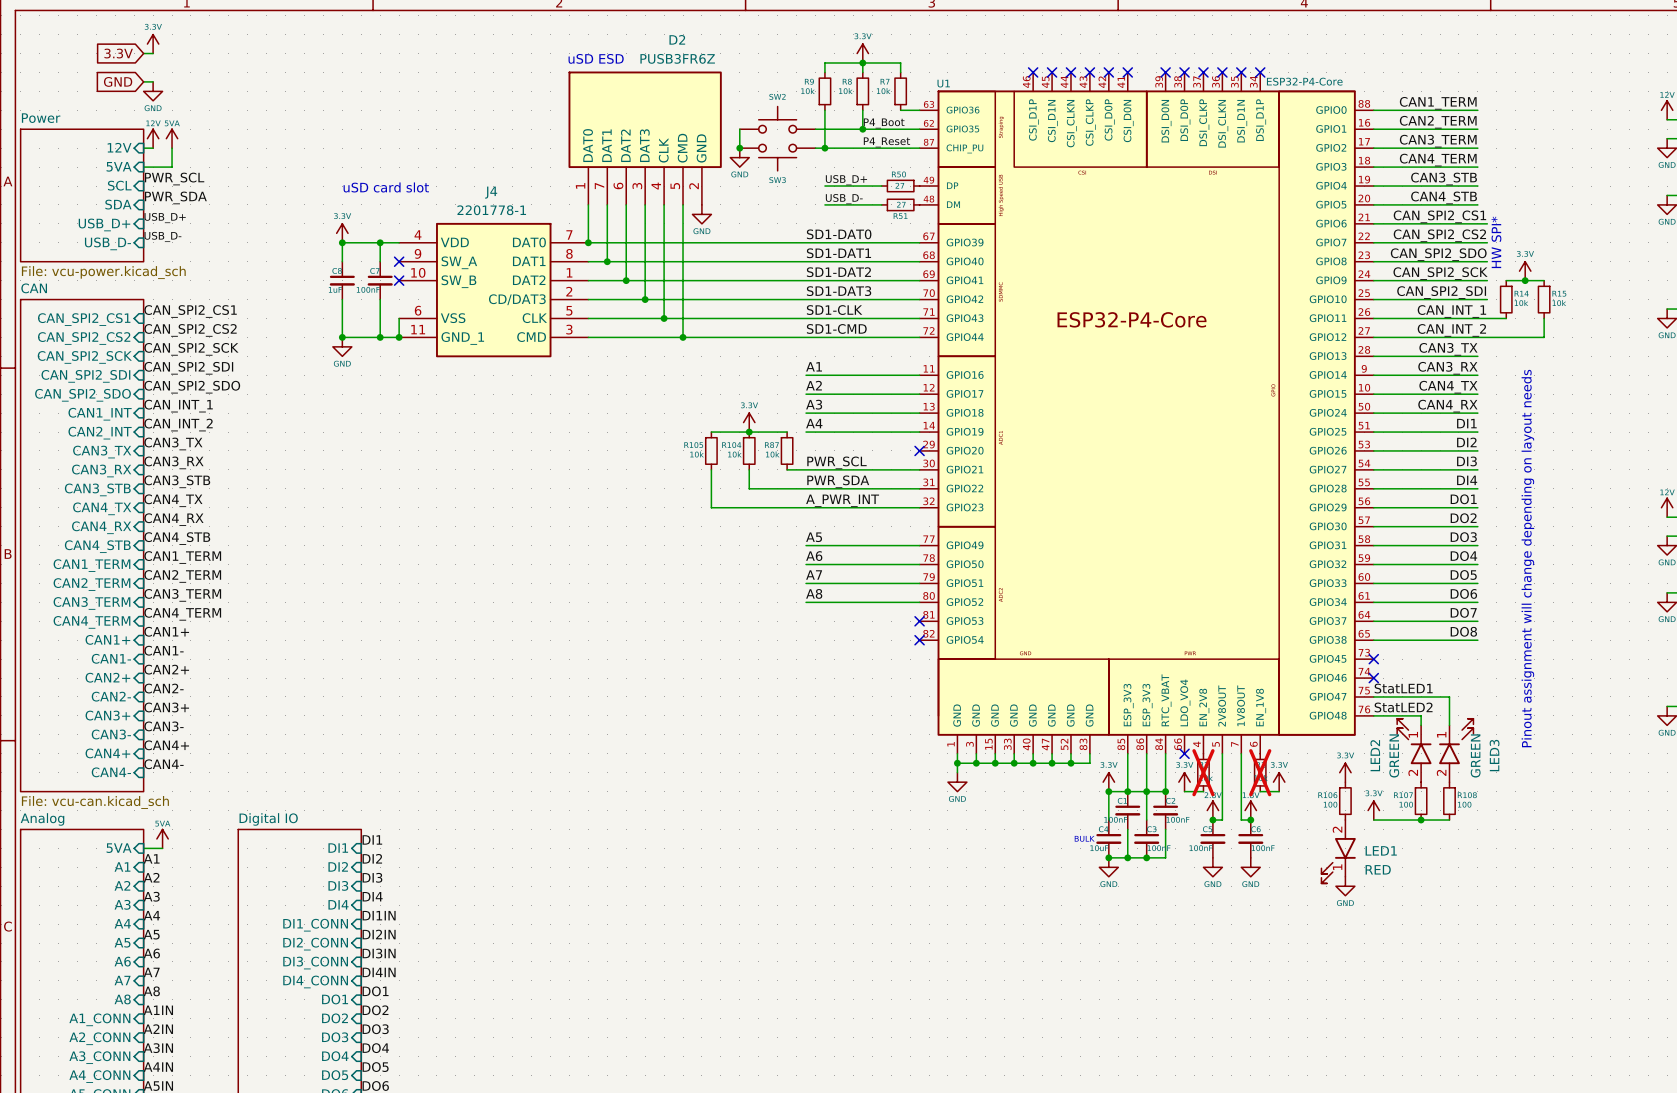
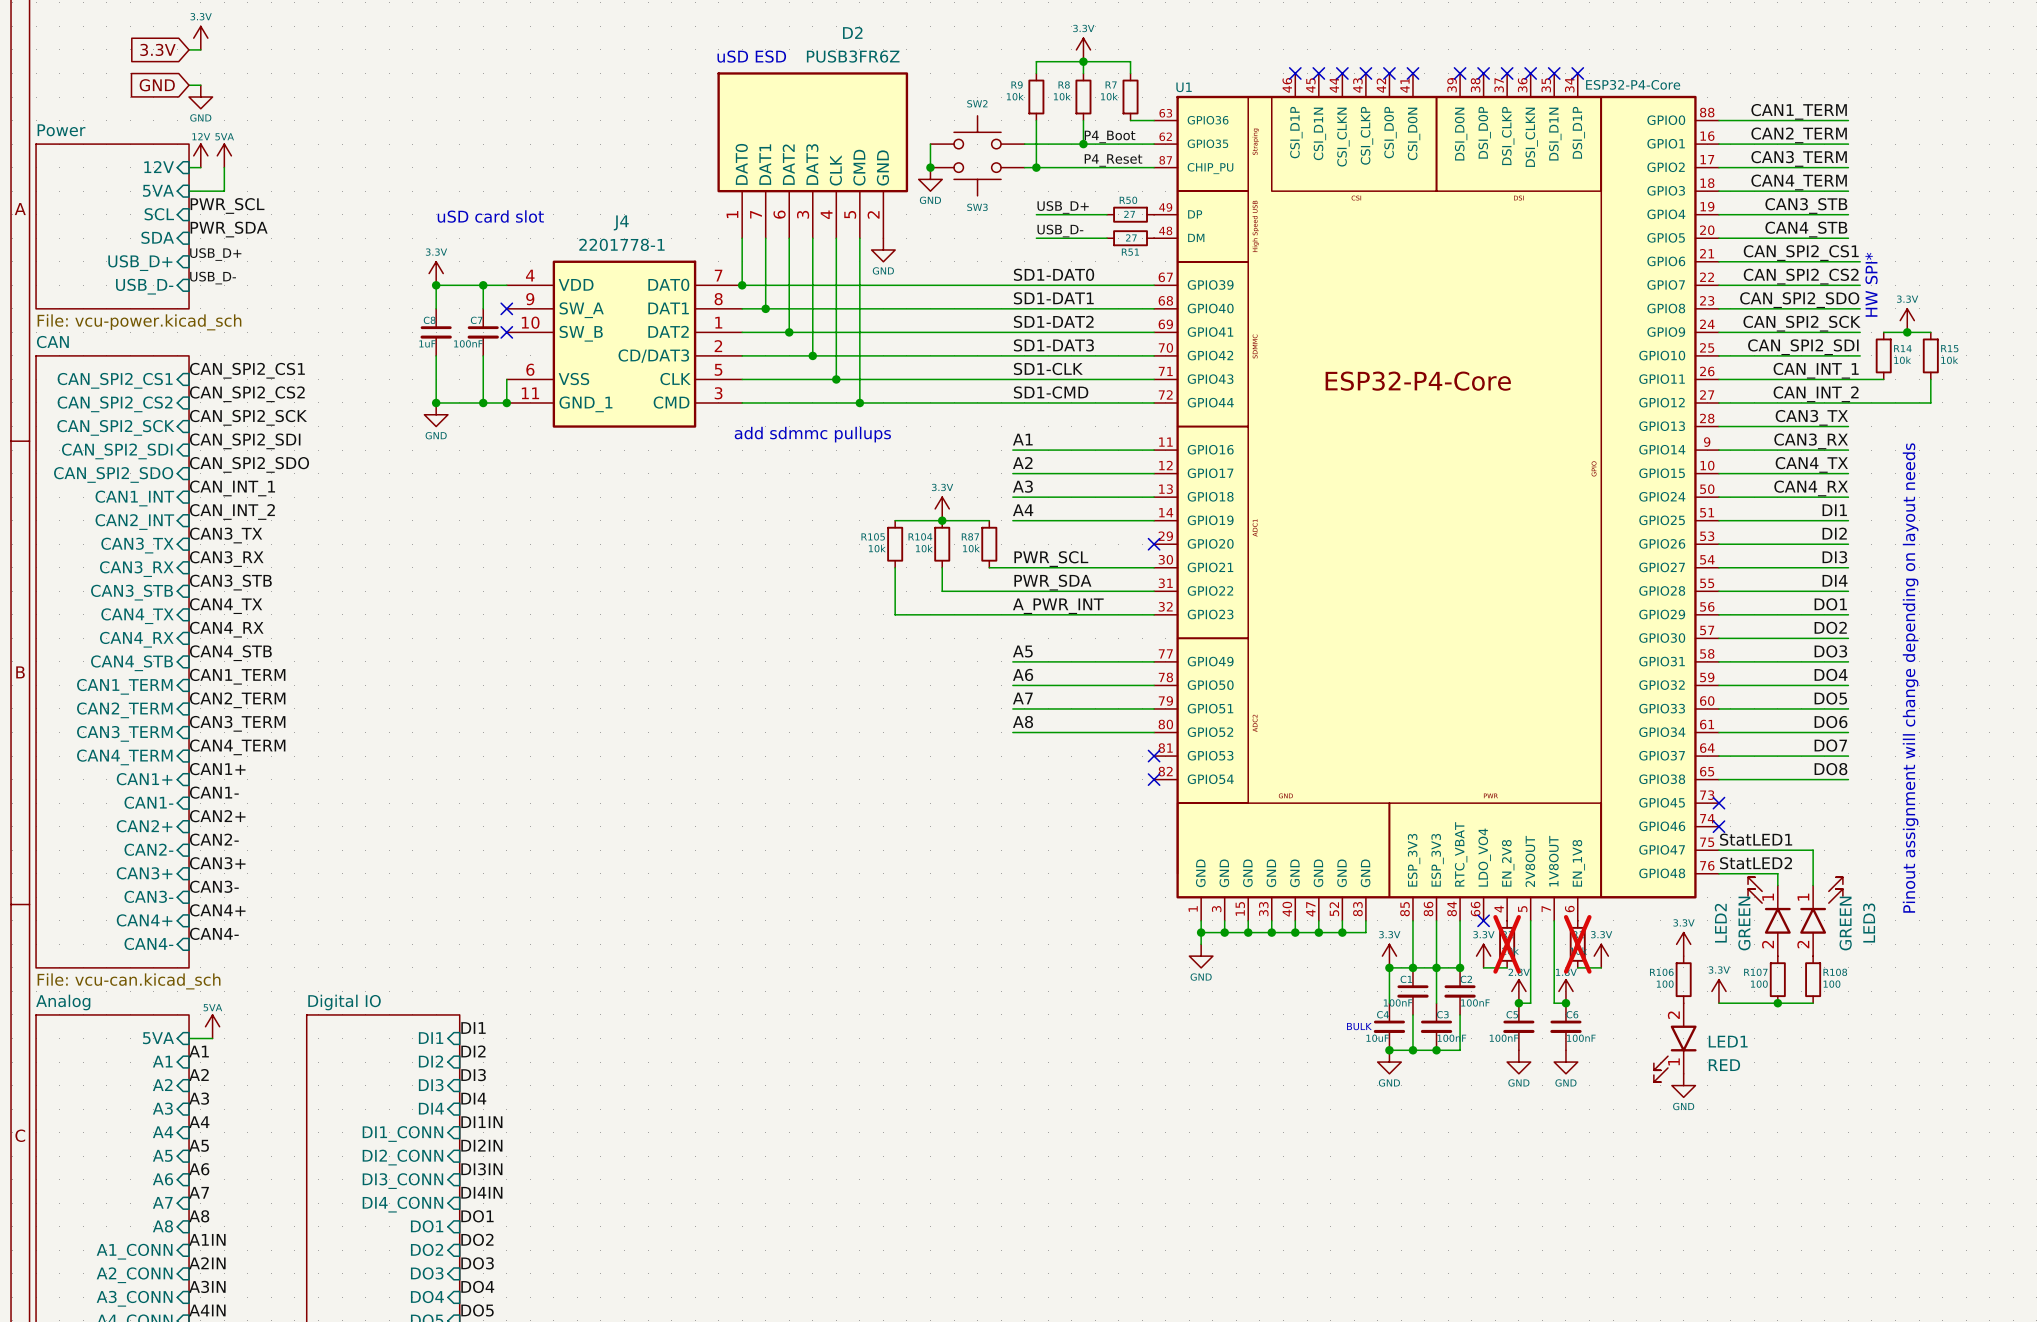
text: none -> add sdmmc pullups (812, 434)

